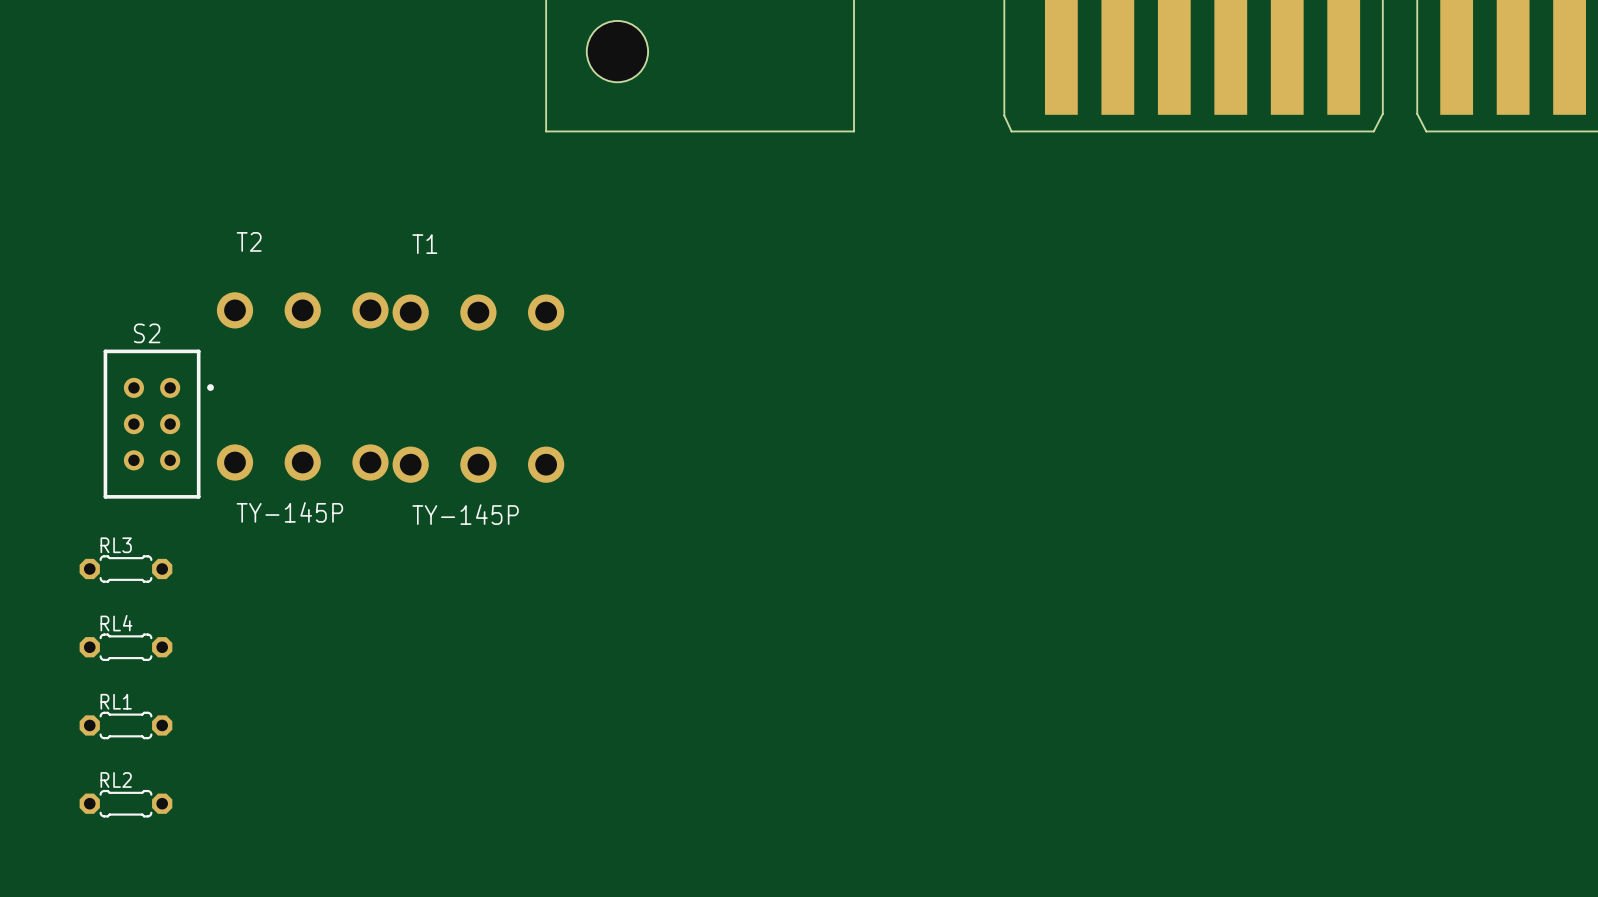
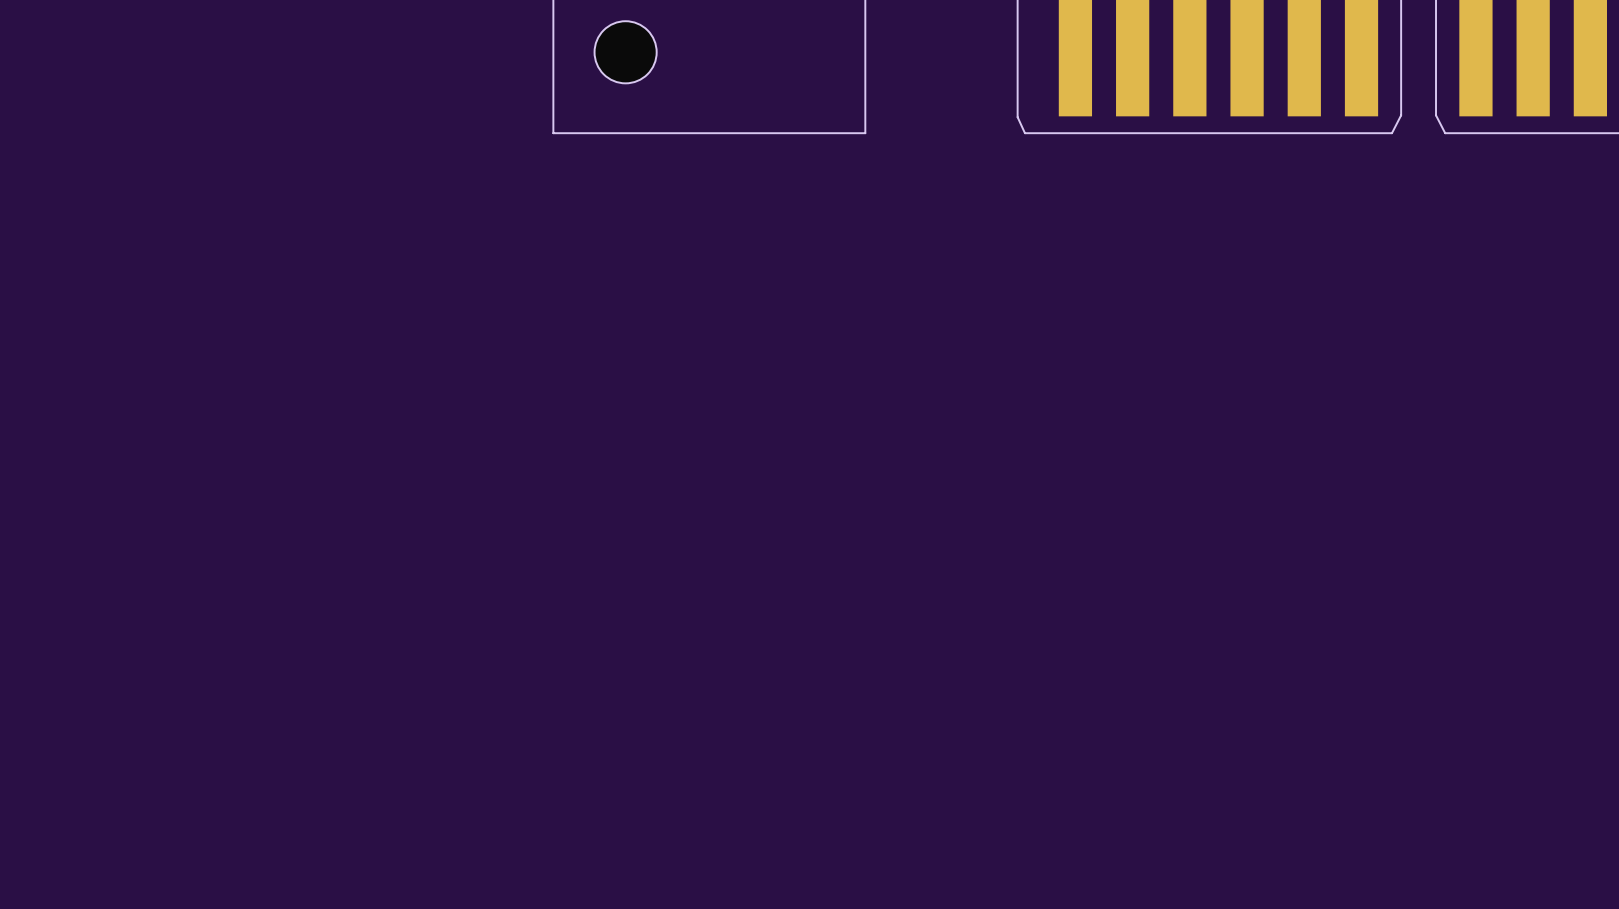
T2: TY-145P (302, 386) -> none
T1: TY-145P (478, 388) -> none
S2: (158, 424) -> none
RL3: (125, 568) -> none
RL4: (125, 647) -> none
RL1: (125, 725) -> none
RL2: (125, 803) -> none

